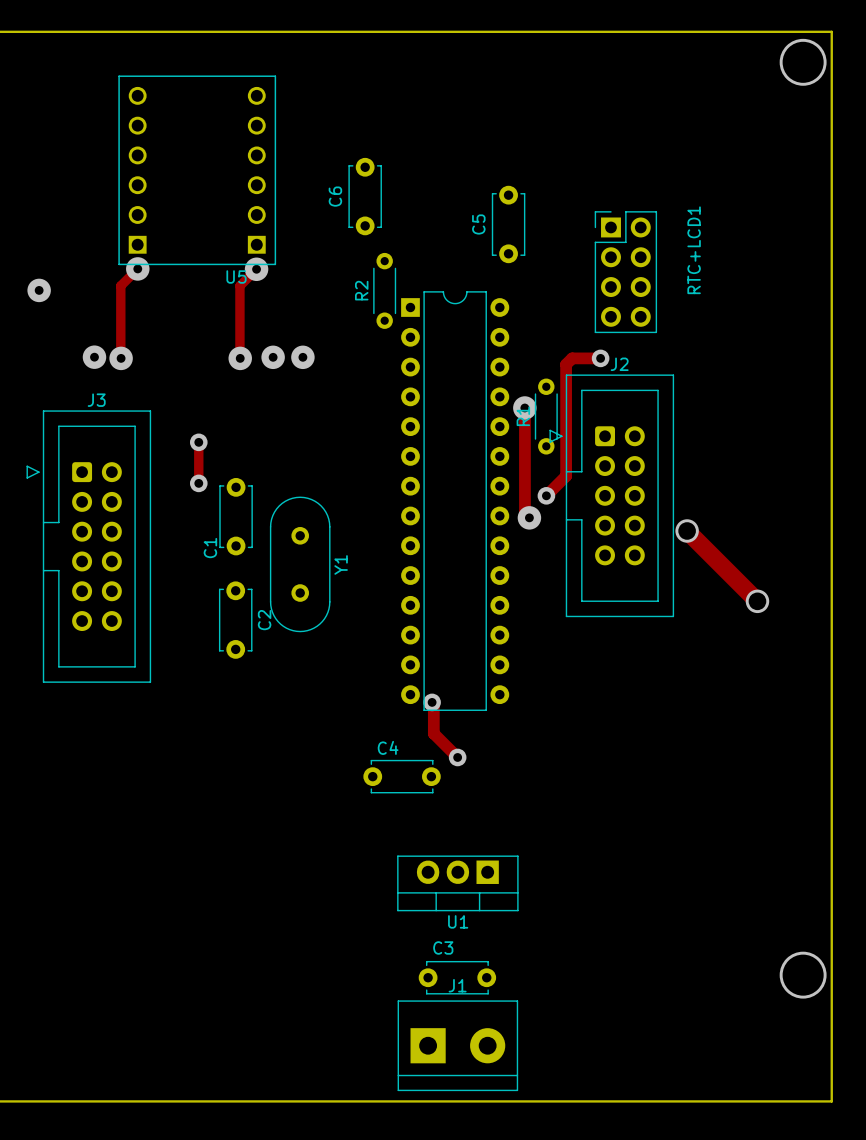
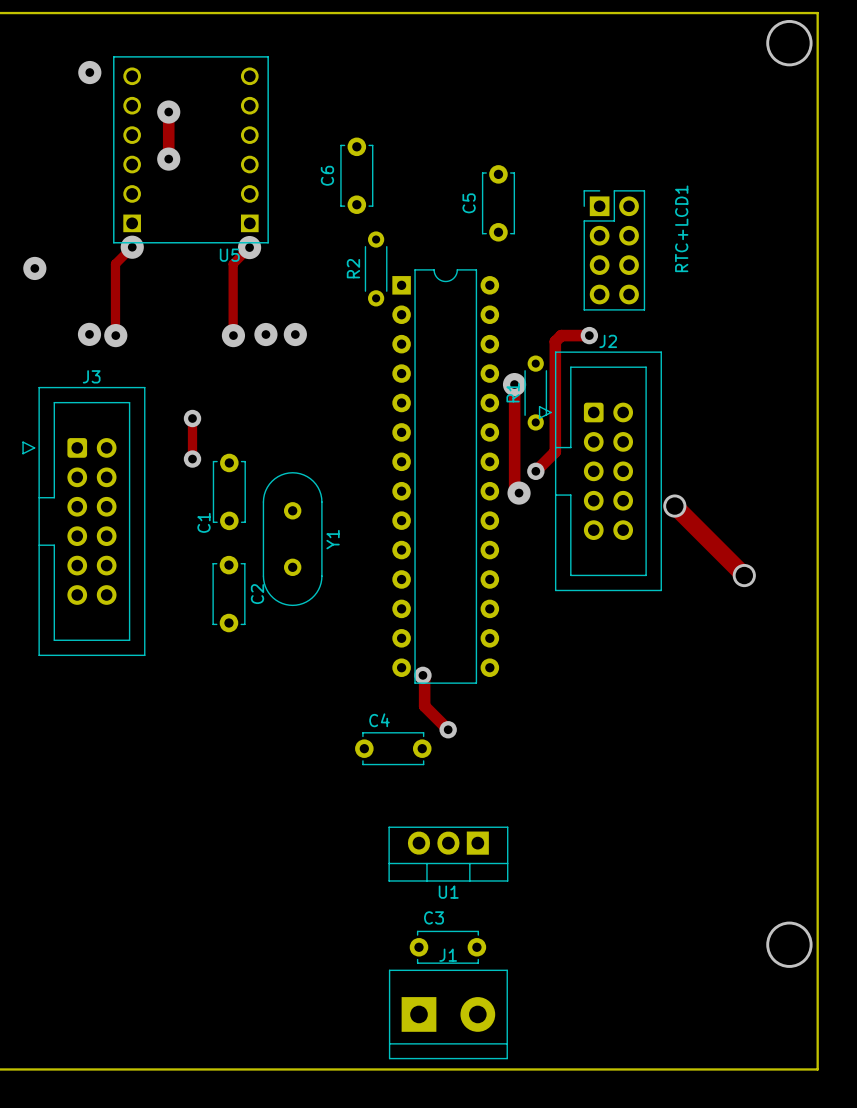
via: none -> (89, 72)
track: none -> (168, 112) (168, 159)
via: none -> (168, 112)
via: none -> (168, 159)

